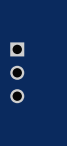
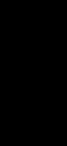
part: (17, 72) -> none

